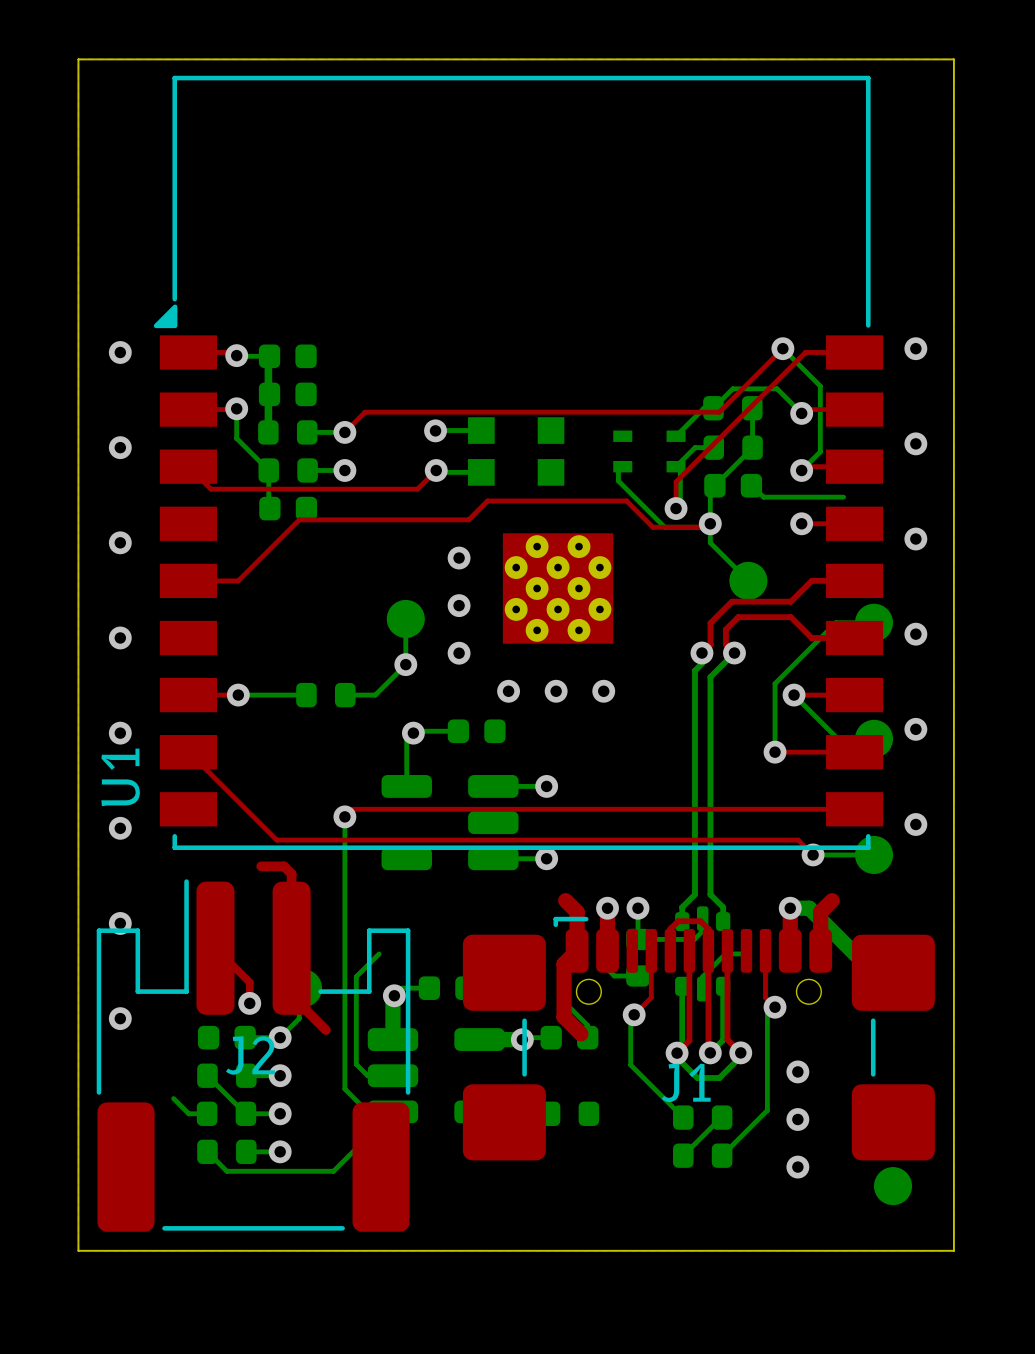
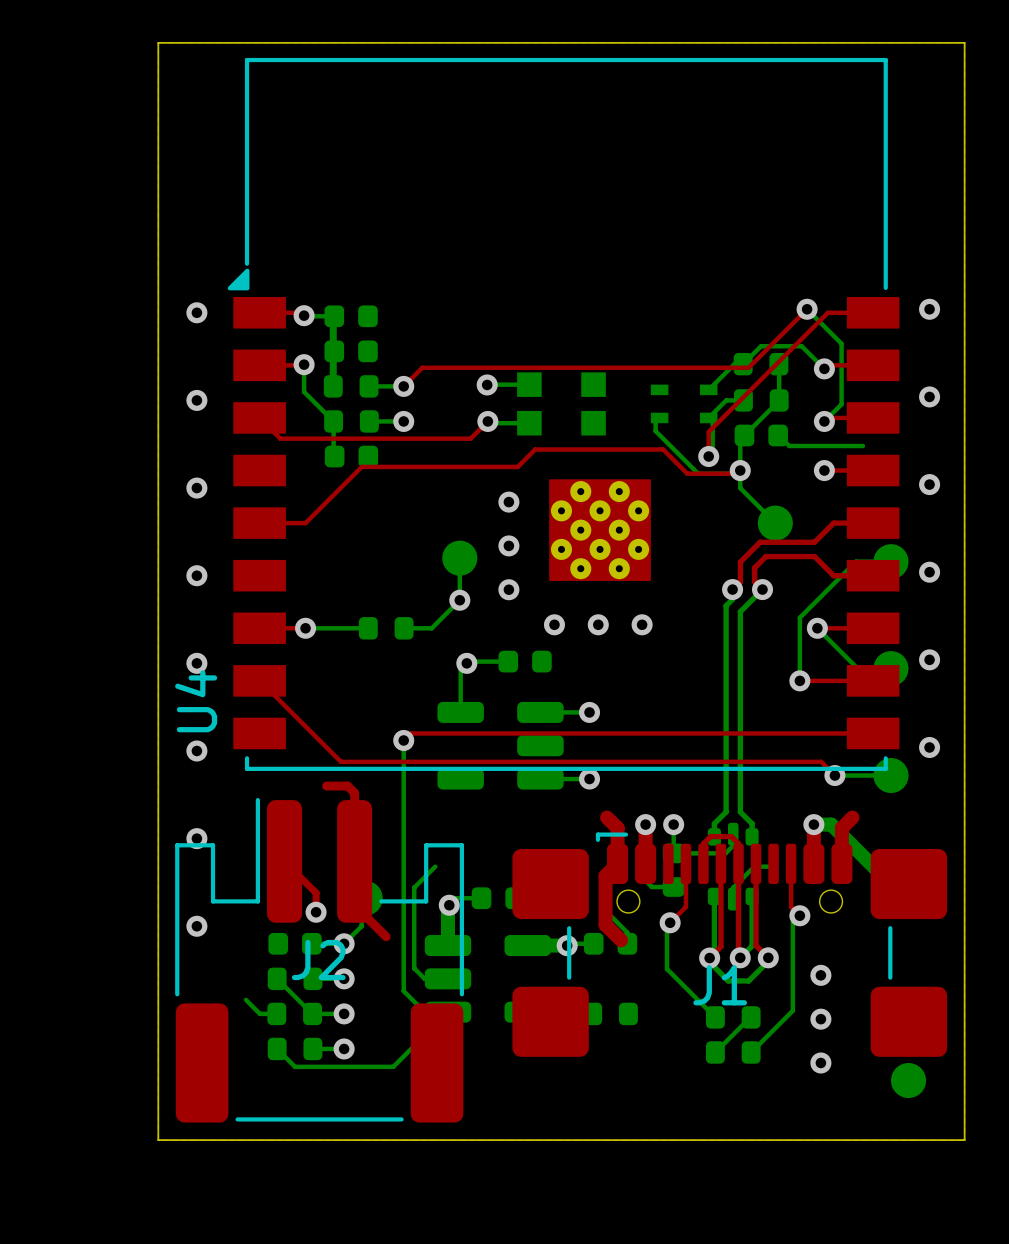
U1 name: U1 (120, 777) -> U4 (196, 701)

